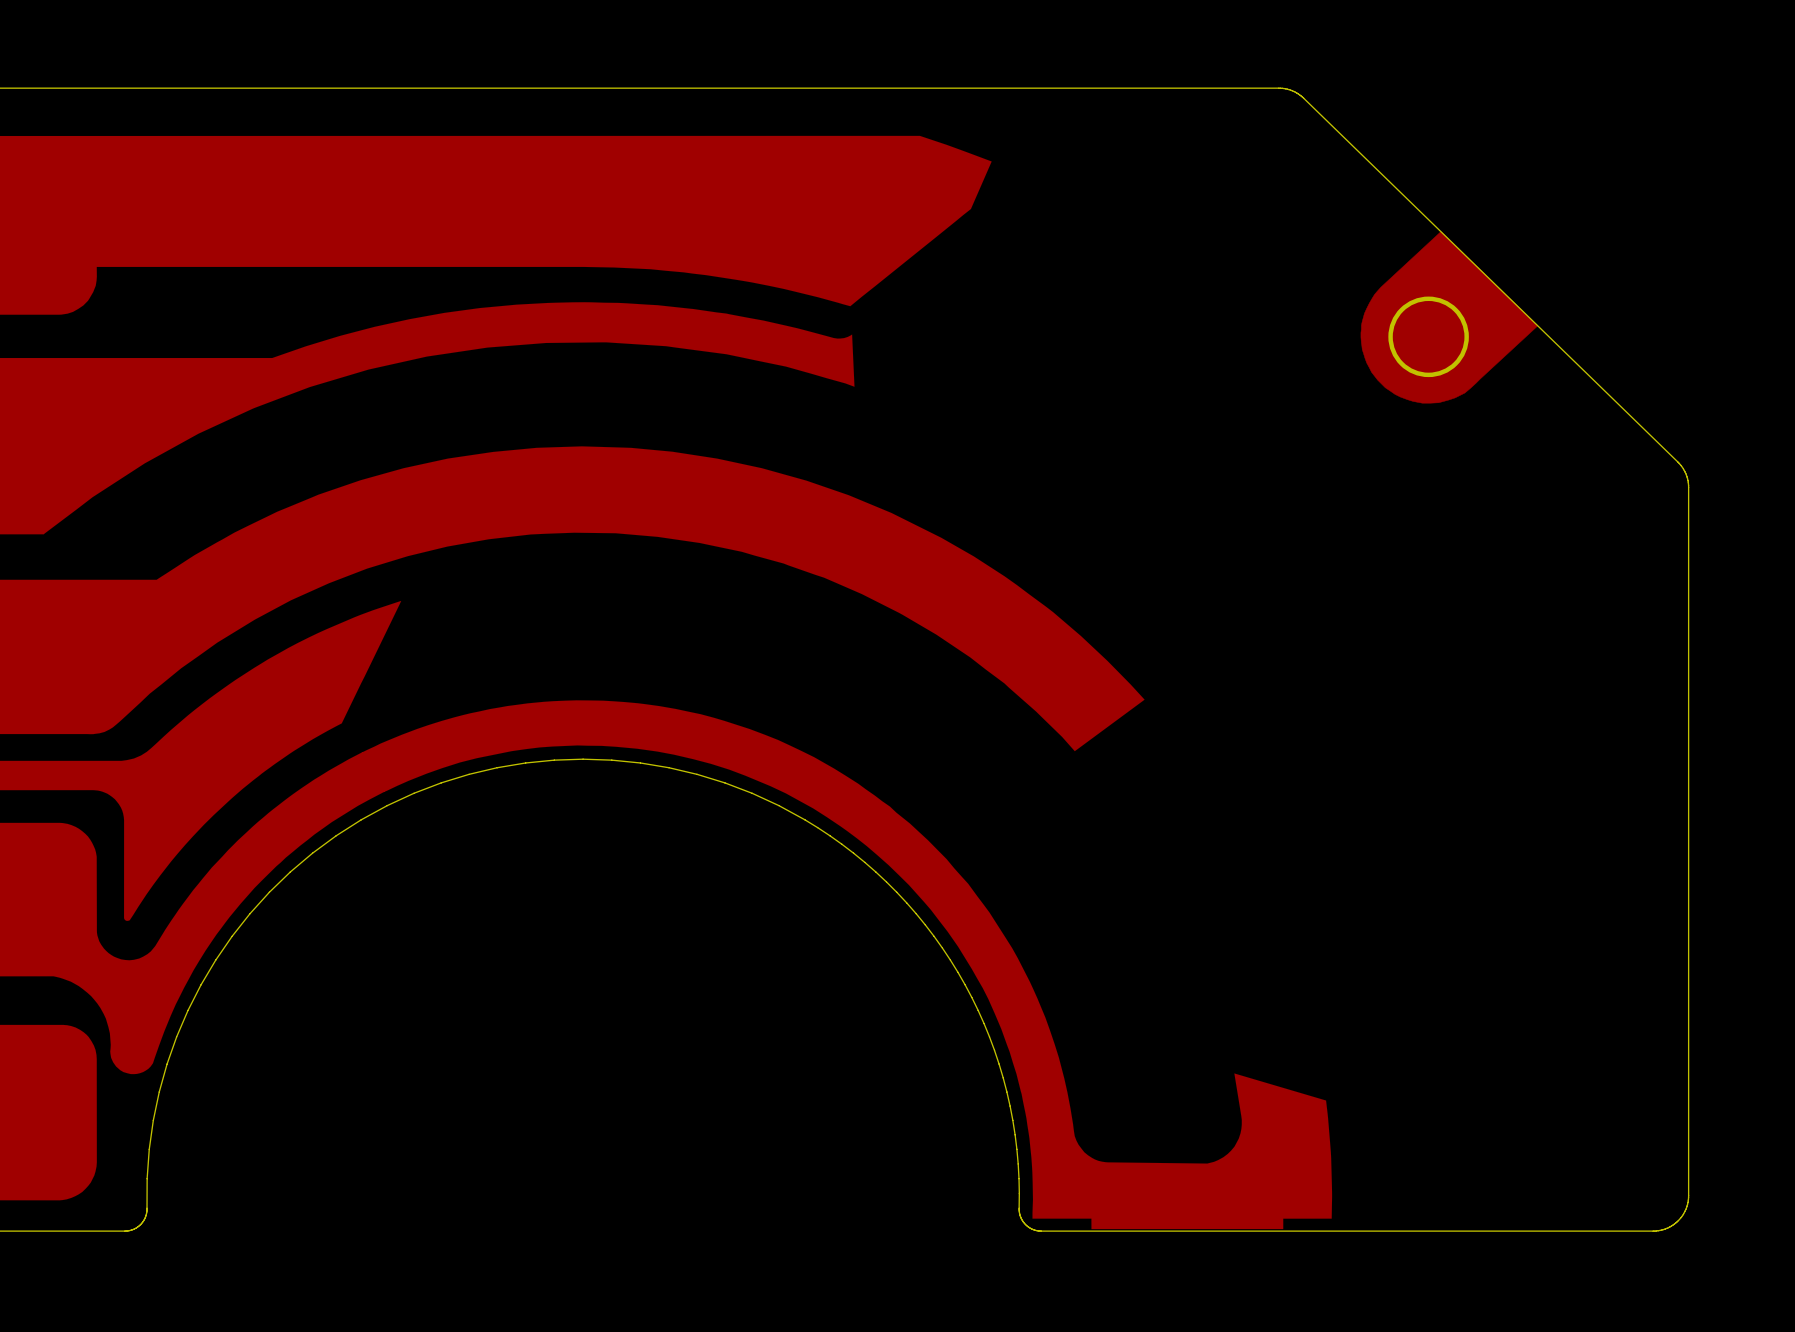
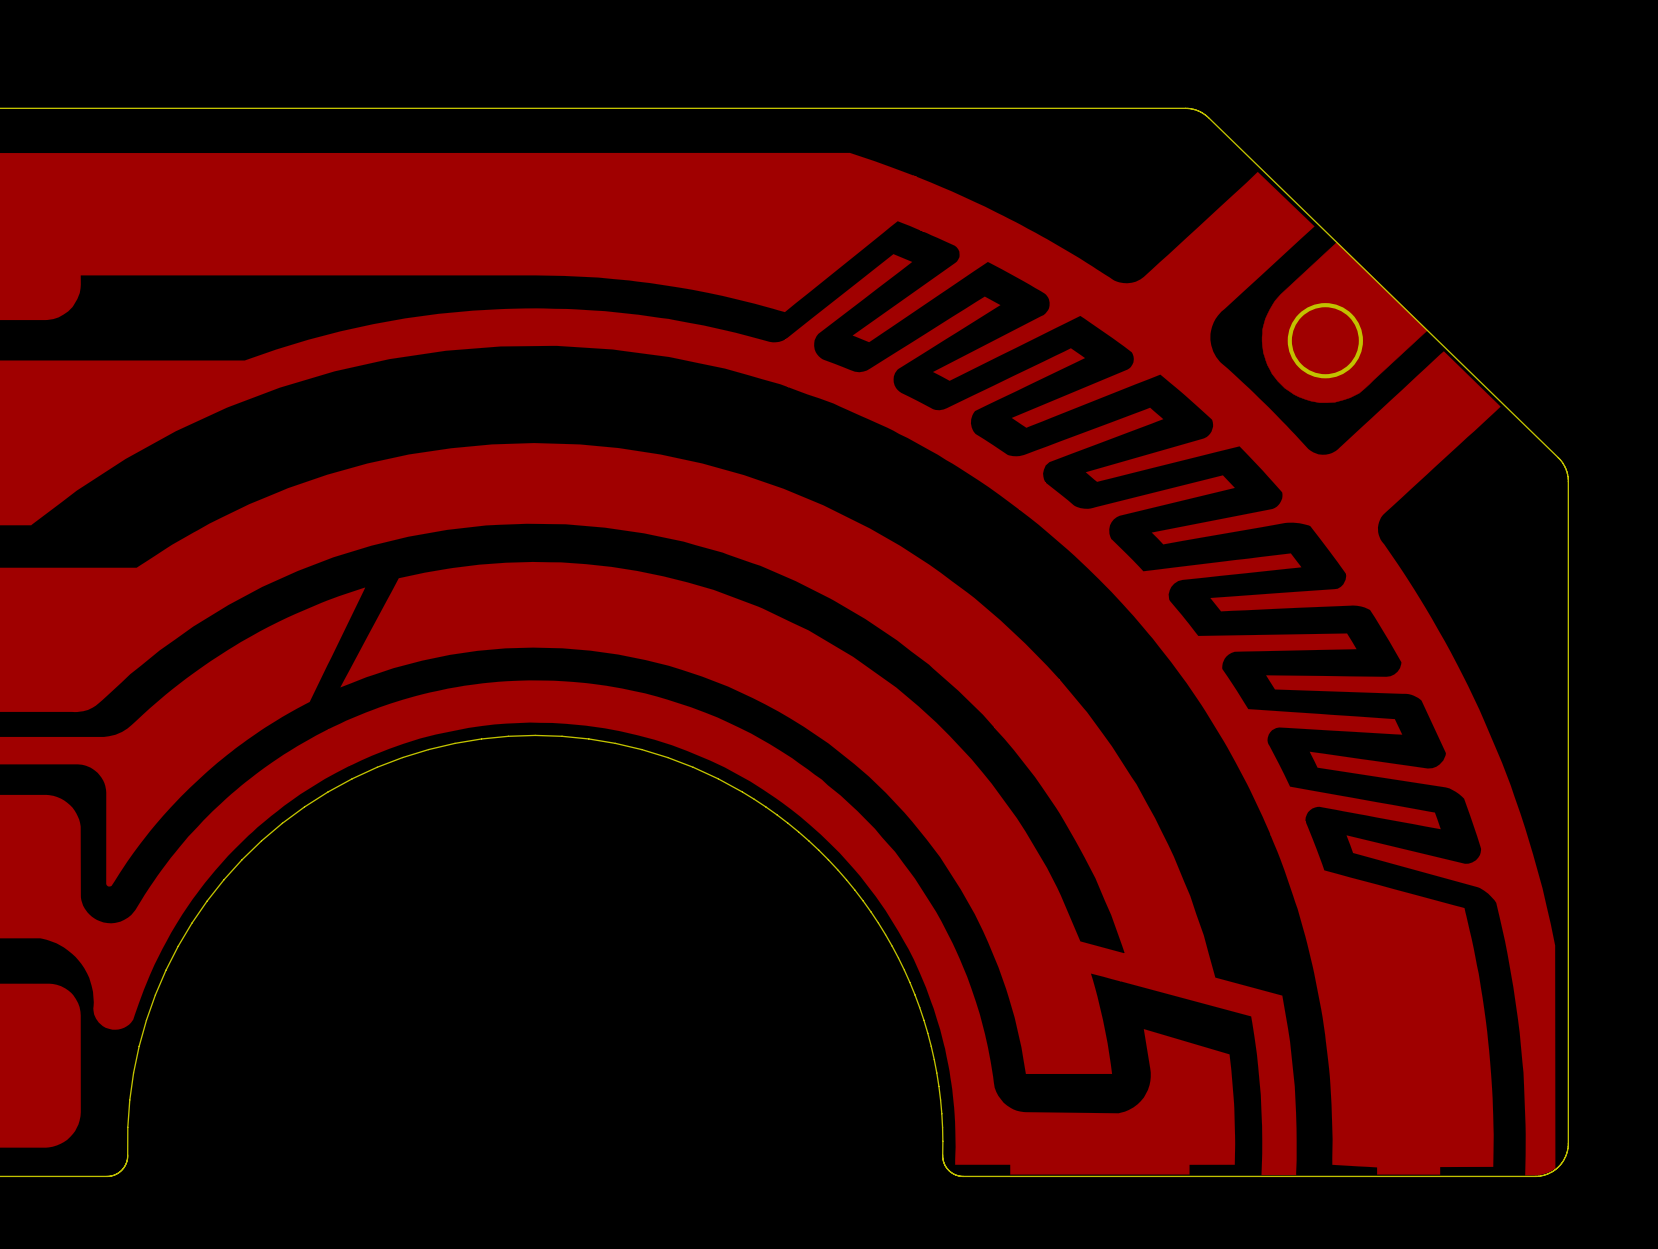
drawing: none -> [340, 171, 1556, 1176]

